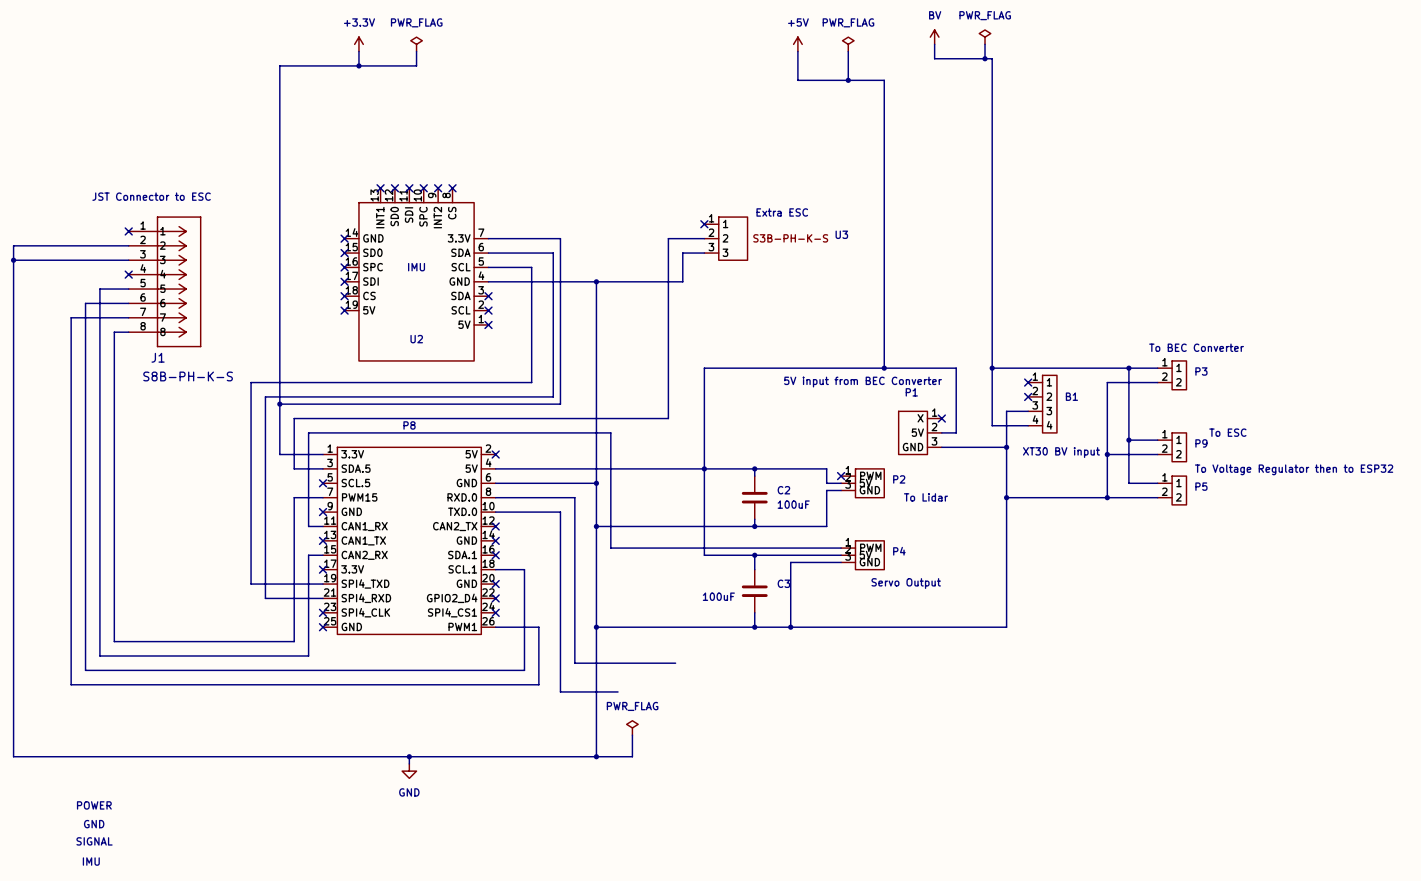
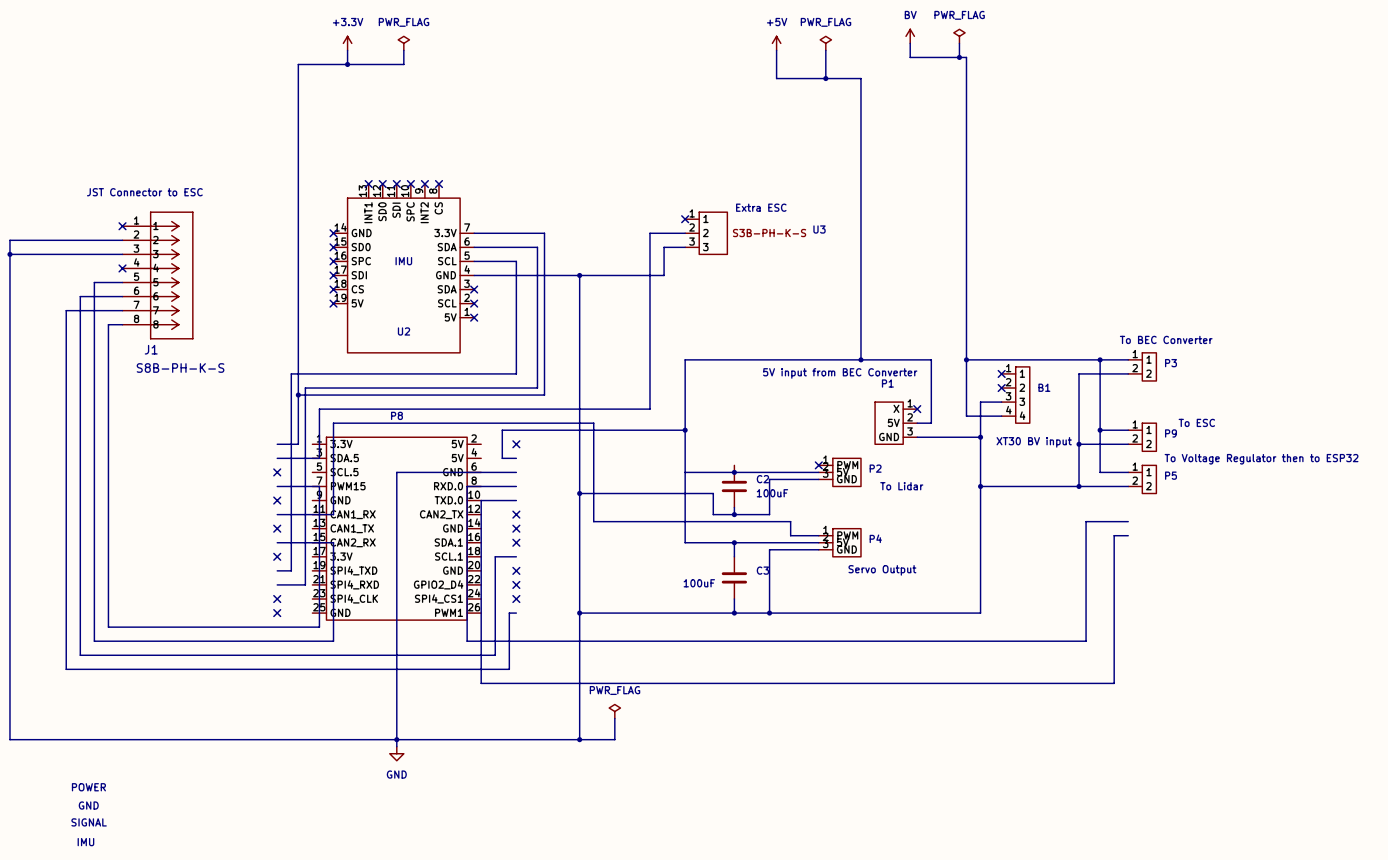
wire: (308, 65) (279, 65) (279, 454) (287, 454) -> (298, 64) (298, 423)
wire: (301, 382) (251, 382) (251, 584) (287, 584) -> (291, 373) (291, 570)
wire: (315, 396) (265, 396) (265, 598) (287, 598) -> (305, 388) (305, 584)
wire: (279, 404) (308, 404) -> none
junction position: (279, 404) -> (298, 395)
wire: (330, 418) (294, 418) (294, 468) -> (319, 409) (319, 458) (312, 458)
wire: (308, 432) (344, 432) -> (312, 514) (333, 514) (333, 423)
junction: none -> (685, 430)
wire: (323, 454) (308, 454) (308, 526) -> (277, 514) (298, 514)
no-connect mark: (495, 454) -> none
no-connect mark: none -> (516, 444)
wire: none -> (277, 458) (284, 458)
wire: (495, 468) (517, 468) -> (685, 430) (502, 430) (502, 458)
wire: (531, 468) (826, 468) (826, 483) -> (685, 472) (804, 472)
junction: (704, 468) -> none
wire: (754, 468) (754, 476) -> none
junction position: (754, 468) -> (734, 472)
no-connect mark: none -> (277, 472)
no-connect mark: (323, 483) -> none
wire: none -> (481, 472) (396, 472) (396, 739)
wire: (531, 483) (596, 483) -> none
junction: (596, 483) -> none
wire: (826, 490) (826, 526) (790, 526) -> (804, 479) (769, 479) (769, 514)
wire: (294, 497) (294, 641) -> (312, 486) (319, 486) (319, 627) (284, 627)
wire: none -> (481, 486) (467, 486) (467, 641) (1086, 641) (1086, 521) (1128, 521)
wire: (531, 497) (574, 497) (574, 663) (675, 663) -> none
junction: none -> (579, 493)
no-connect mark: none -> (277, 500)
no-connect mark: (323, 512) -> none
wire: none -> (481, 500) (481, 683) (1114, 683) (1114, 535) (1128, 535)
wire: (531, 512) (560, 512) (560, 691) (618, 691) -> none
no-connect mark: (495, 526) -> none
no-connect mark: none -> (516, 514)
wire: (596, 526) (733, 526) -> (579, 493) (713, 493) (713, 514)
junction: (596, 526) -> none
wire: (610, 533) (610, 548) (812, 548) -> (593, 521) (790, 521) (790, 535)
no-connect mark: none -> (277, 528)
no-connect mark: (323, 540) -> none
no-connect mark: (495, 540) -> none
no-connect mark: none -> (516, 528)
wire: (308, 555) (308, 655) -> (312, 542) (333, 542) (333, 641) (298, 641)
no-connect mark: (495, 555) -> none
no-connect mark: none -> (516, 542)
no-connect mark: none -> (277, 556)
no-connect mark: (323, 569) -> none
wire: (495, 569) (510, 569) -> (495, 655) (495, 556)
wire: (524, 569) (524, 627) (495, 627) -> (509, 556) (516, 556)
wire: (301, 584) (323, 584) -> (277, 542) (298, 542)
no-connect mark: (495, 584) -> none
no-connect mark: none -> (516, 570)
wire: (315, 598) (323, 598) -> (277, 486) (284, 486)
no-connect mark: (495, 598) -> none
no-connect mark: none -> (516, 584)
no-connect mark: none -> (277, 599)
no-connect mark: (323, 612) -> none
no-connect mark: (495, 612) -> none
no-connect mark: none -> (516, 599)
no-connect mark: none -> (277, 613)
no-connect mark: (323, 627) -> none
wire: (531, 627) (538, 627) (538, 684) (524, 684) -> none
wire: (510, 670) (524, 670) -> (509, 669) (509, 655)

